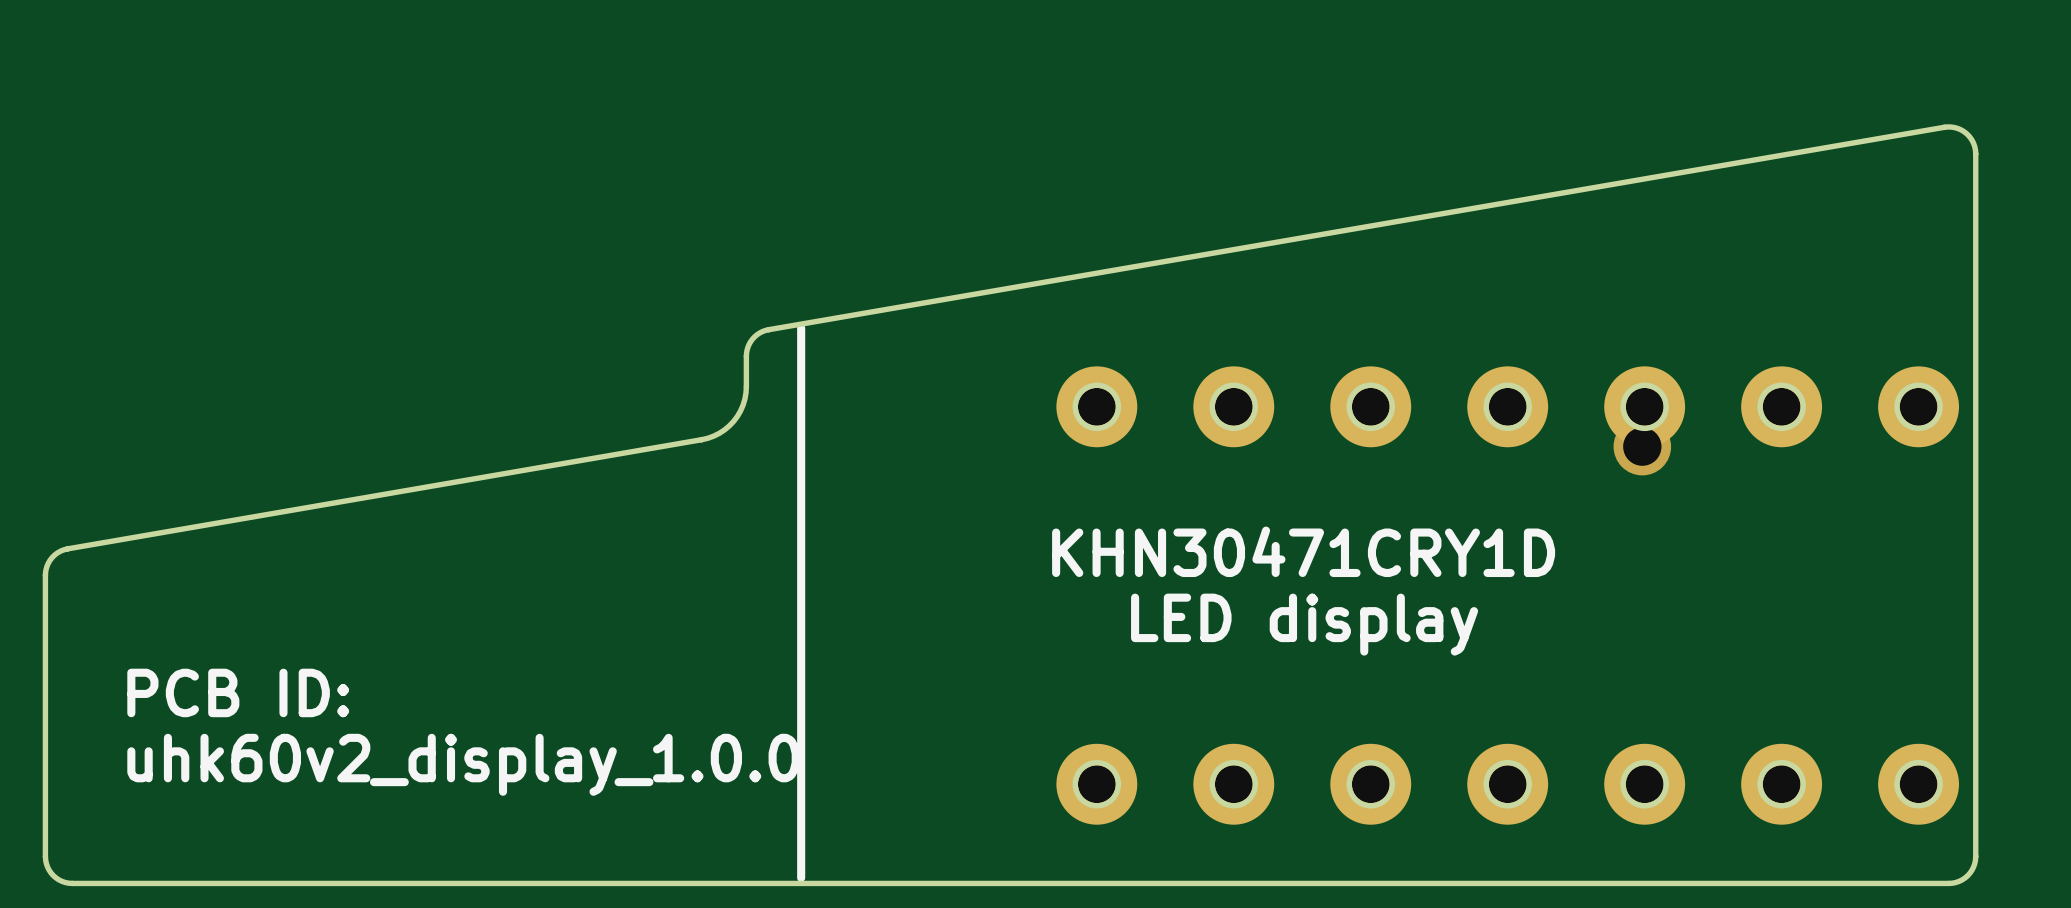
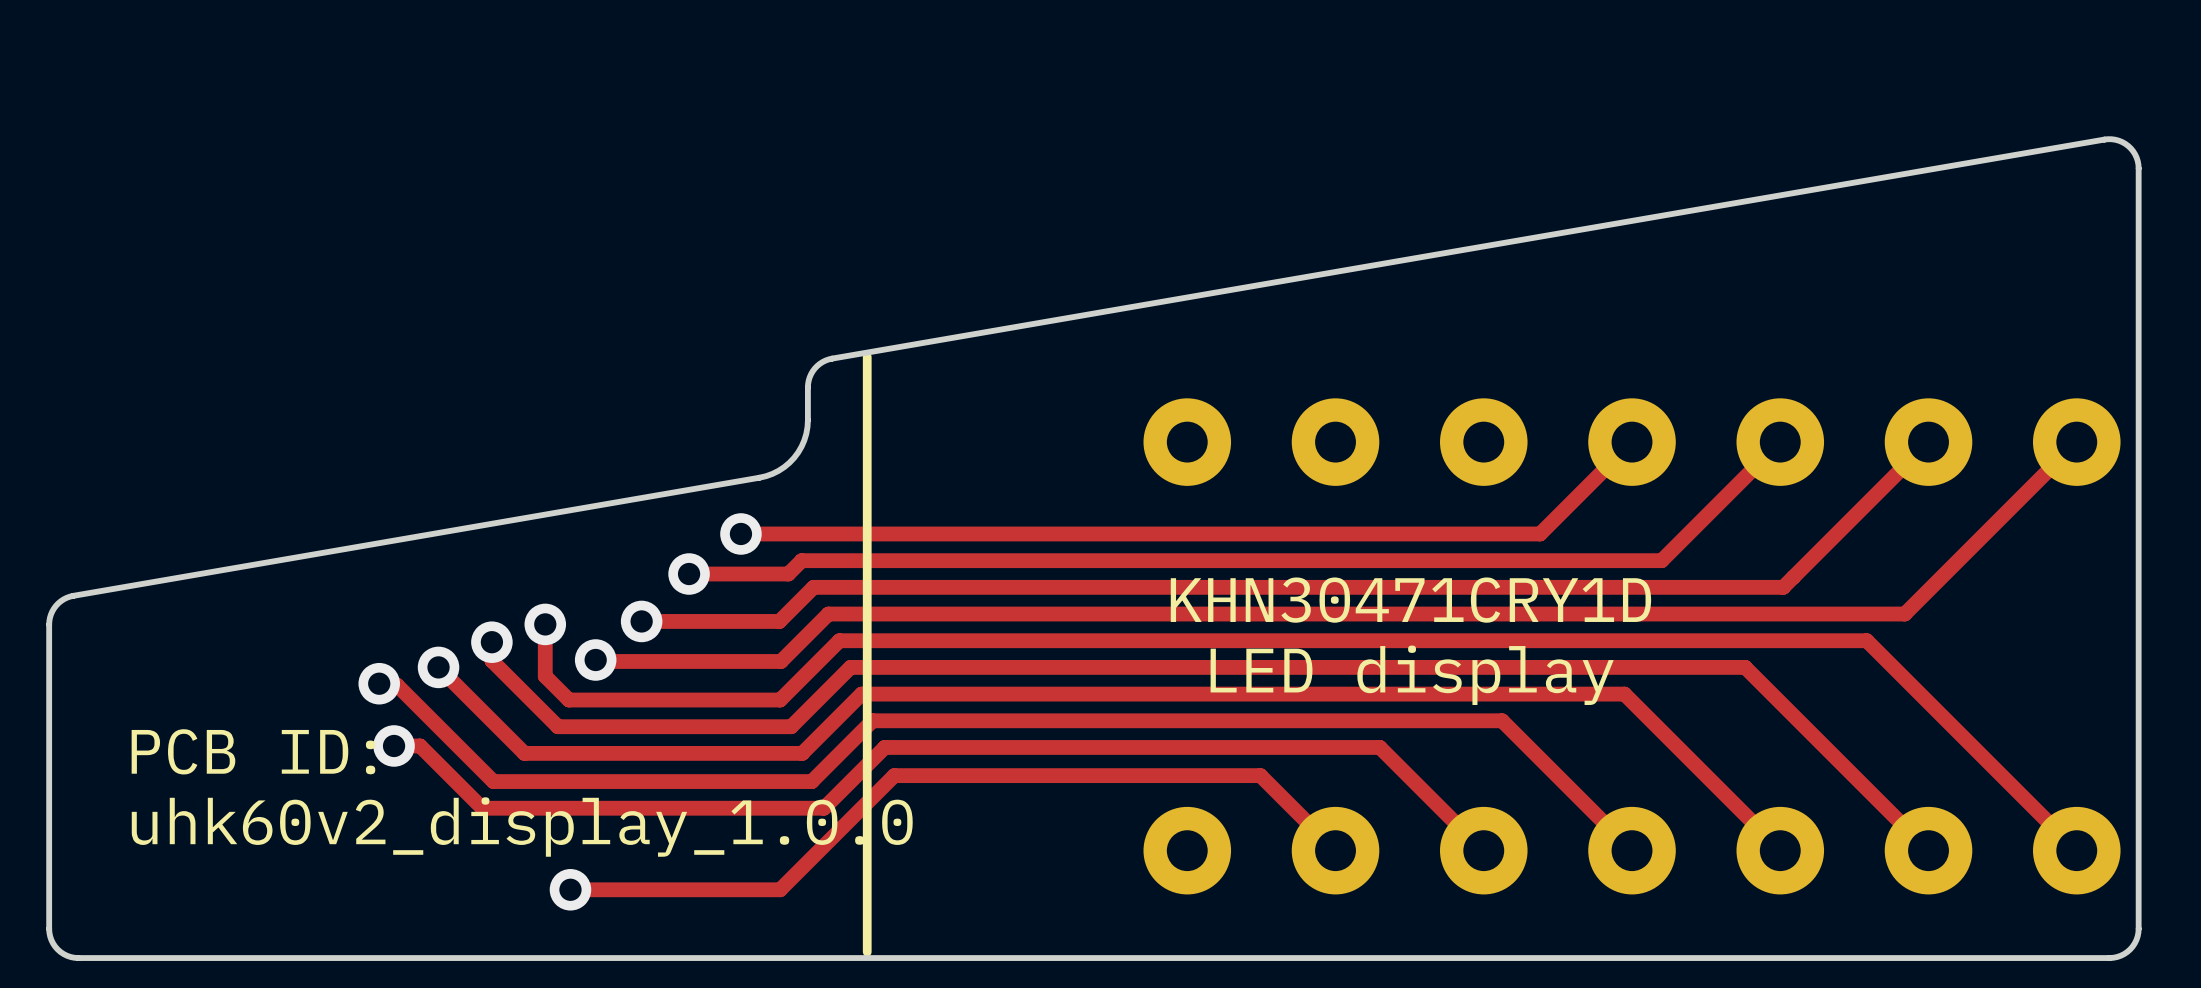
round board edge: [1072, 382, 1122, 432] -> none
round board edge: [1209, 382, 1259, 432] -> none
round board edge: [1346, 382, 1396, 432] -> none
round board edge: [1483, 382, 1532, 432] -> none
round board edge: [1620, 382, 1669, 432] -> none
round board edge: [1757, 382, 1806, 432] -> none
round board edge: [1894, 382, 1943, 432] -> none
track: none -> (1632, 442) (1540, 533) (740, 533)
track: none -> (1780, 442) (1661, 560) (801, 560) (788, 574) (689, 574)
track: none -> (1928, 442) (1783, 587) (813, 587) (779, 621) (640, 621)
track: none -> (2076, 442) (1904, 614) (828, 614) (780, 661) (588, 659)
via: (1642, 446) -> none
via: none -> (740, 533)
via: none -> (689, 574)
via: none -> (641, 621)
track: none -> (545, 624) (545, 676) (568, 700) (780, 700) (839, 640) (1866, 640) (2076, 850)
via: none -> (545, 624)
track: none -> (491, 642) (491, 660) (557, 726) (791, 726) (850, 667) (1745, 667) (1928, 850)
via: none -> (491, 642)
via: none -> (595, 659)
track: none -> (438, 667) (524, 753) (802, 753) (861, 694) (1624, 694) (1780, 849)
via: none -> (438, 667)
via: none -> (379, 683)
track: none -> (377, 685) (397, 685) (493, 781) (811, 781) (872, 720) (1502, 720) (1632, 850)
track: none -> (394, 745) (420, 745) (482, 808) (823, 808) (884, 747) (1379, 747) (1483, 850)
via: none -> (394, 745)
round board edge: [1072, 759, 1122, 809] -> none
round board edge: [1209, 759, 1259, 809] -> none
round board edge: [1346, 759, 1396, 809] -> none
round board edge: [1483, 759, 1532, 809] -> none
round board edge: [1620, 759, 1669, 809] -> none
round board edge: [1757, 759, 1806, 809] -> none
round board edge: [1894, 759, 1943, 809] -> none
track: none -> (1335, 850) (1260, 775) (894, 775) (780, 889) (570, 889)
via: none -> (570, 889)

